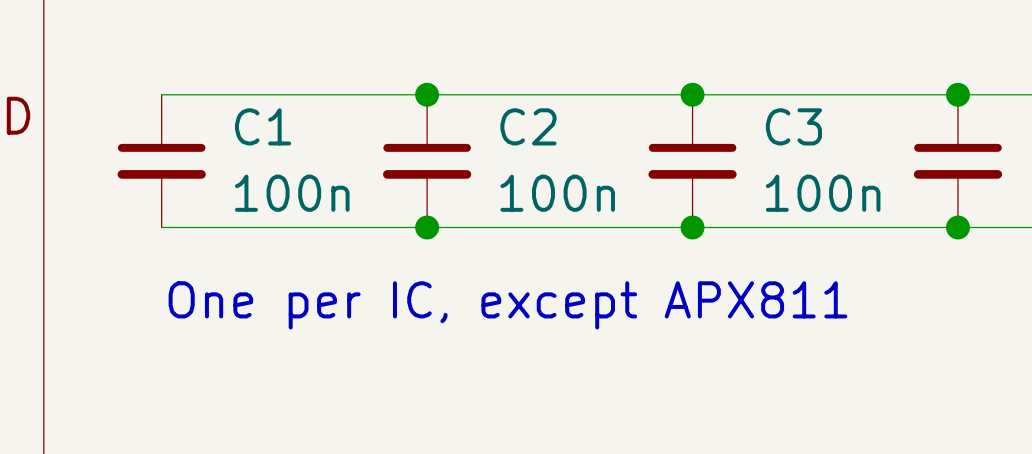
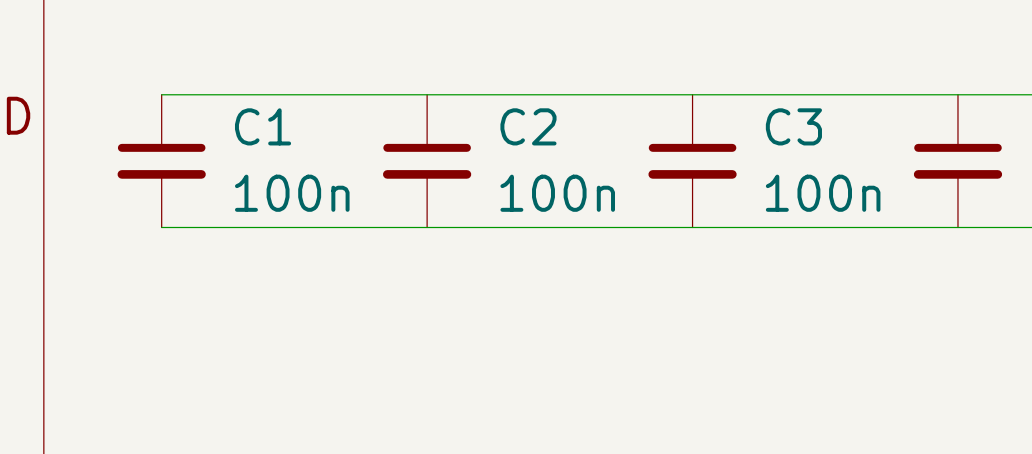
junction: (427, 94) -> none
junction: (692, 94) -> none
junction: (957, 94) -> none
junction: (427, 227) -> none
junction: (692, 227) -> none
junction: (957, 227) -> none
text: One per IC, except APX811 (507, 305) -> none

